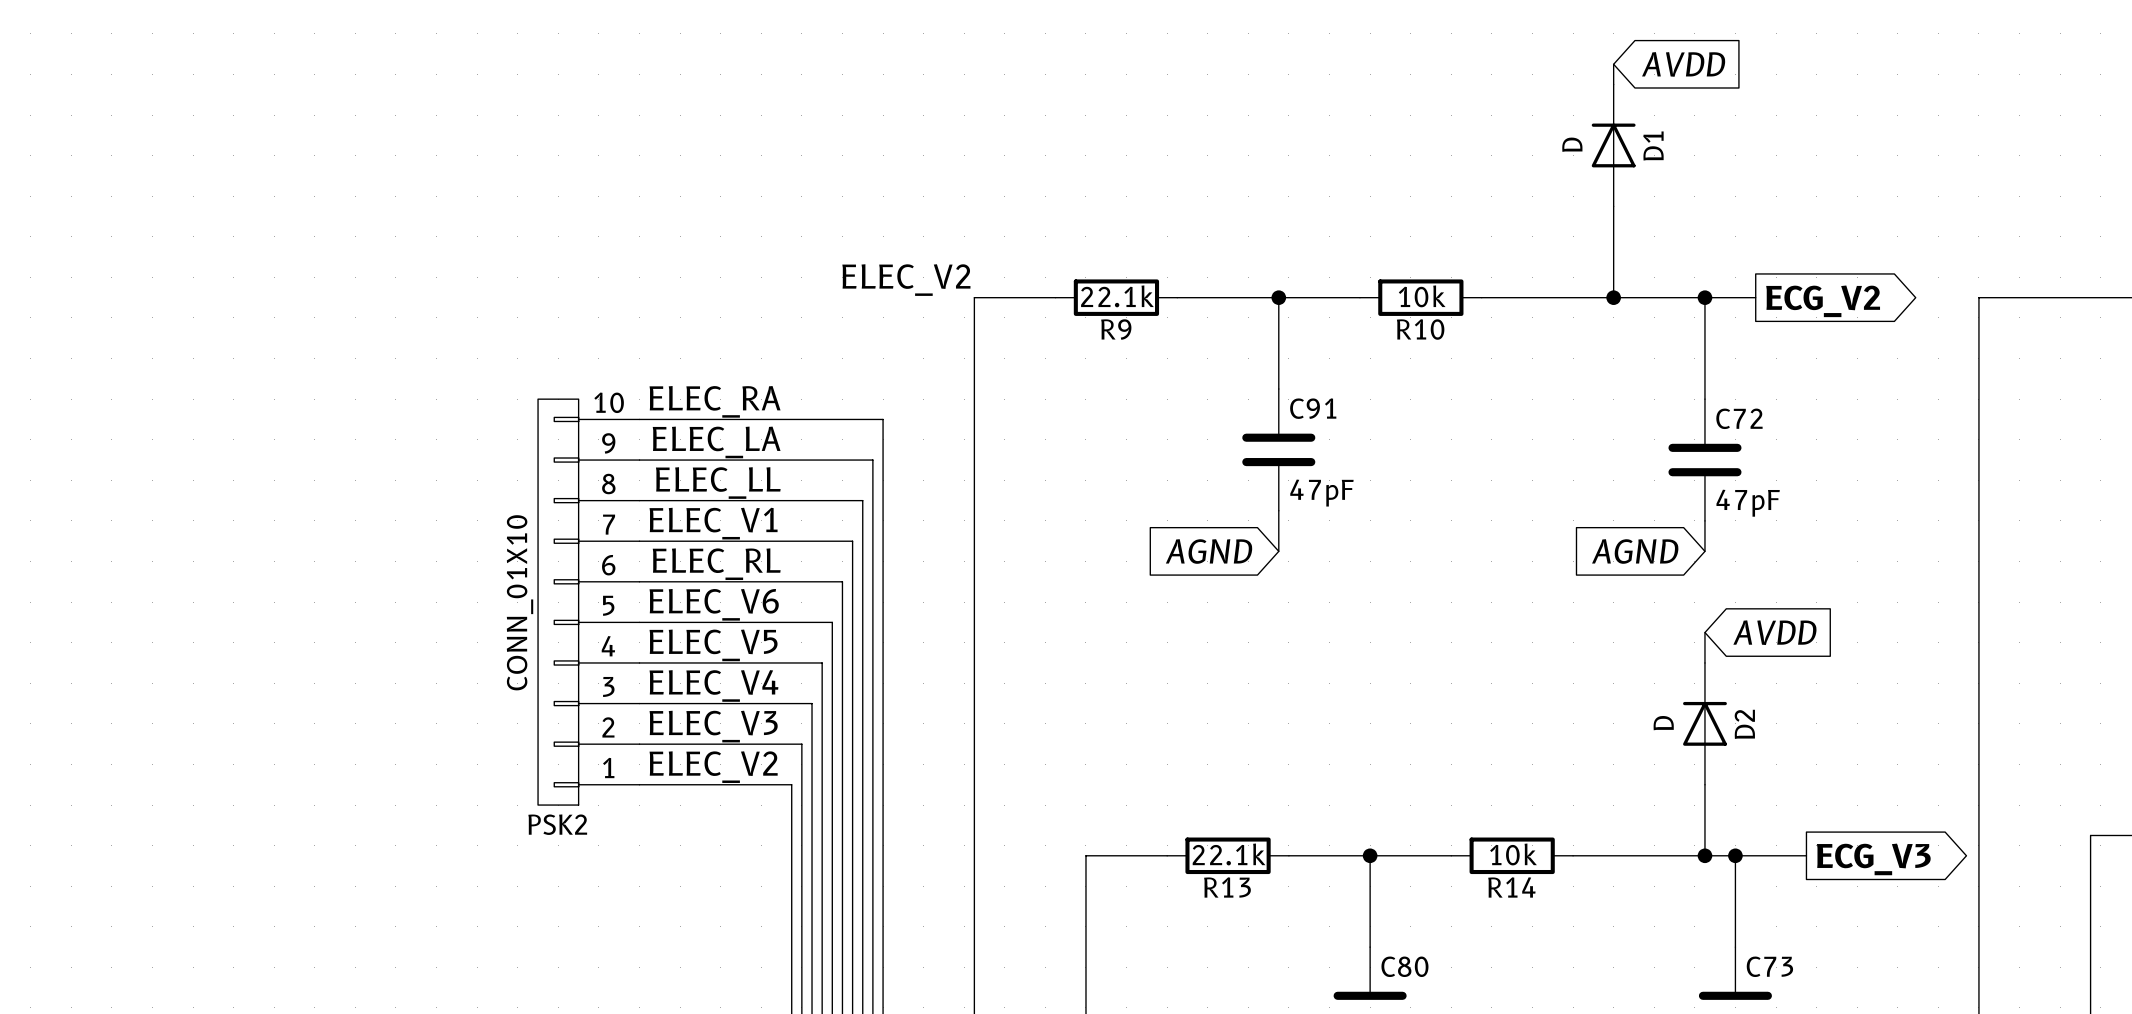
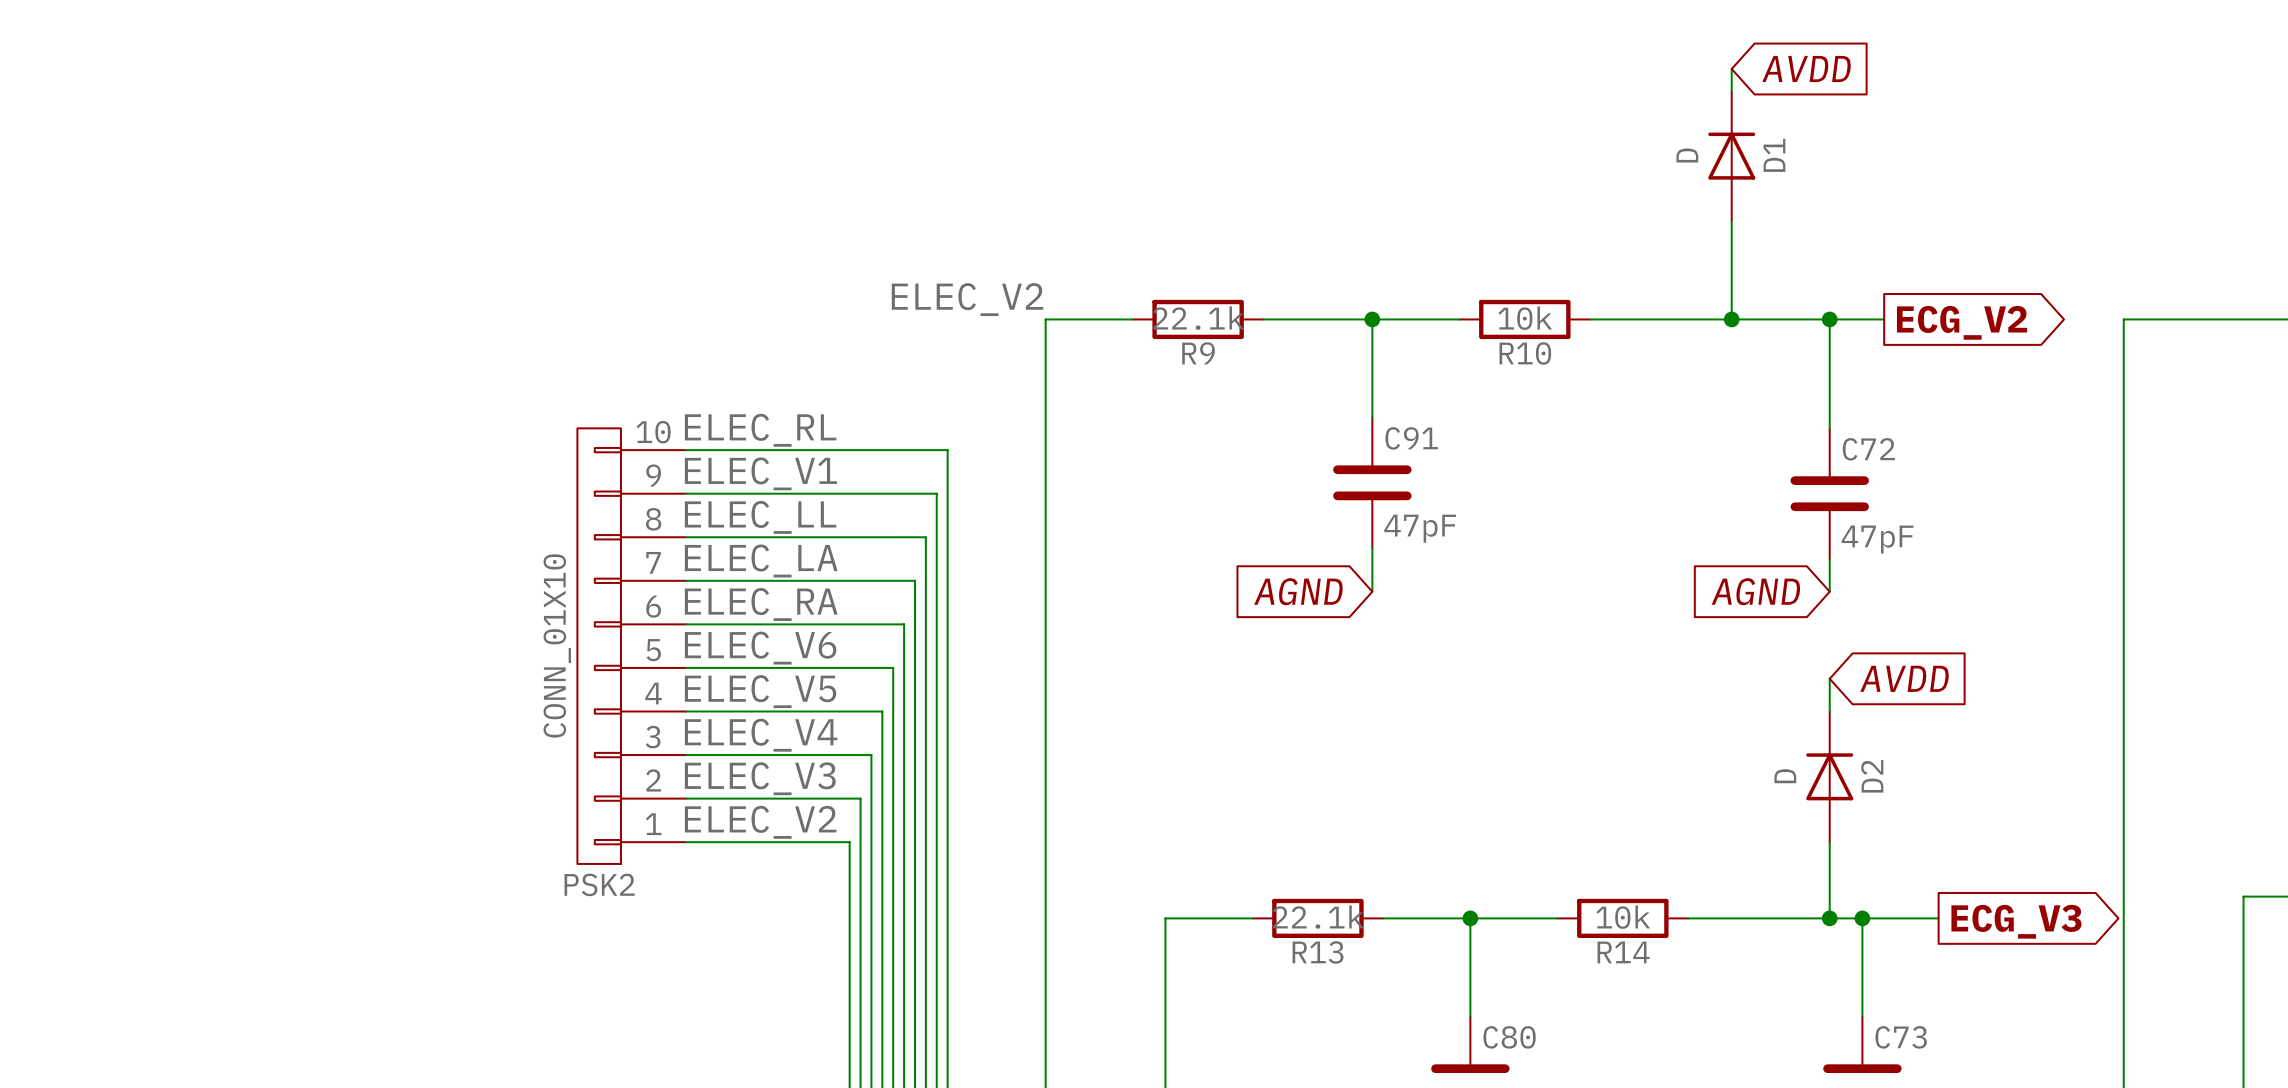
label: ELEC_RA (715, 401) -> ELEC_RL (760, 430)
label: ELEC_LA (716, 442) -> ELEC_V1 (760, 473)
label: ELEC_V1 (713, 523) -> ELEC_LA (761, 560)
label: ELEC_RL (716, 564) -> ELEC_RA (761, 604)

